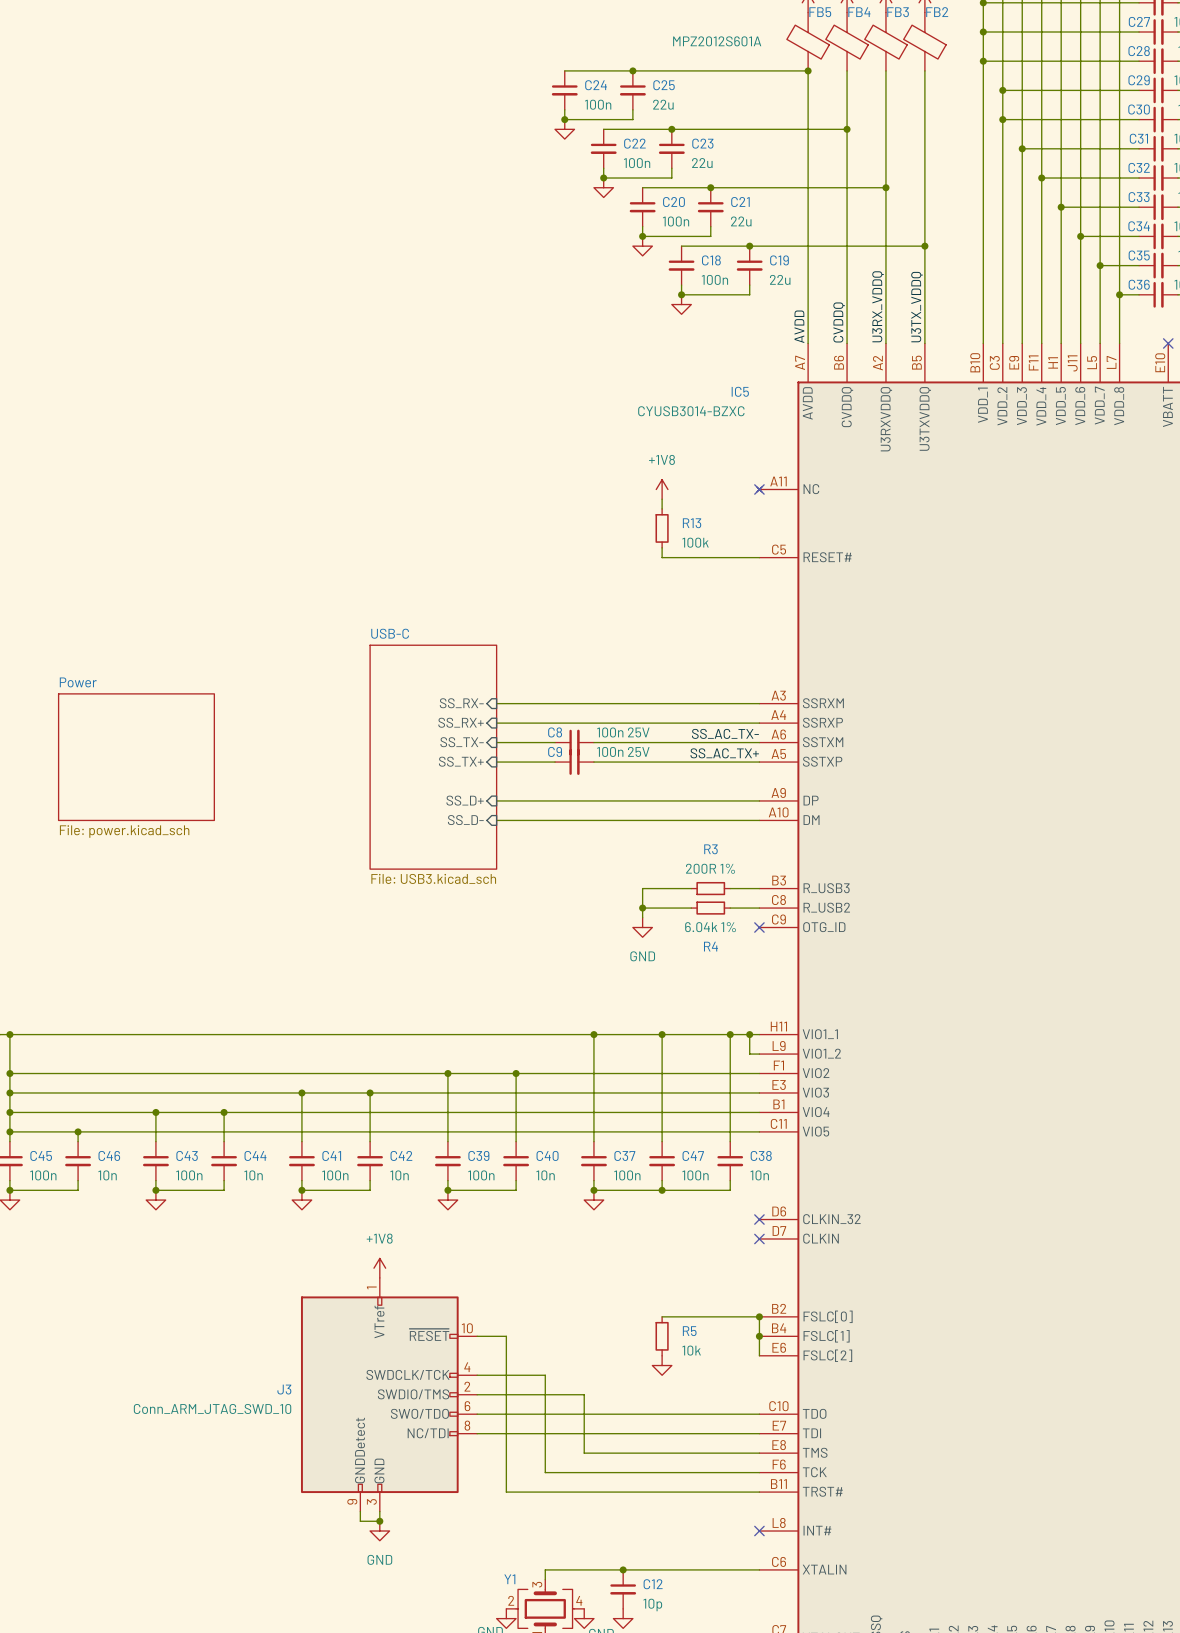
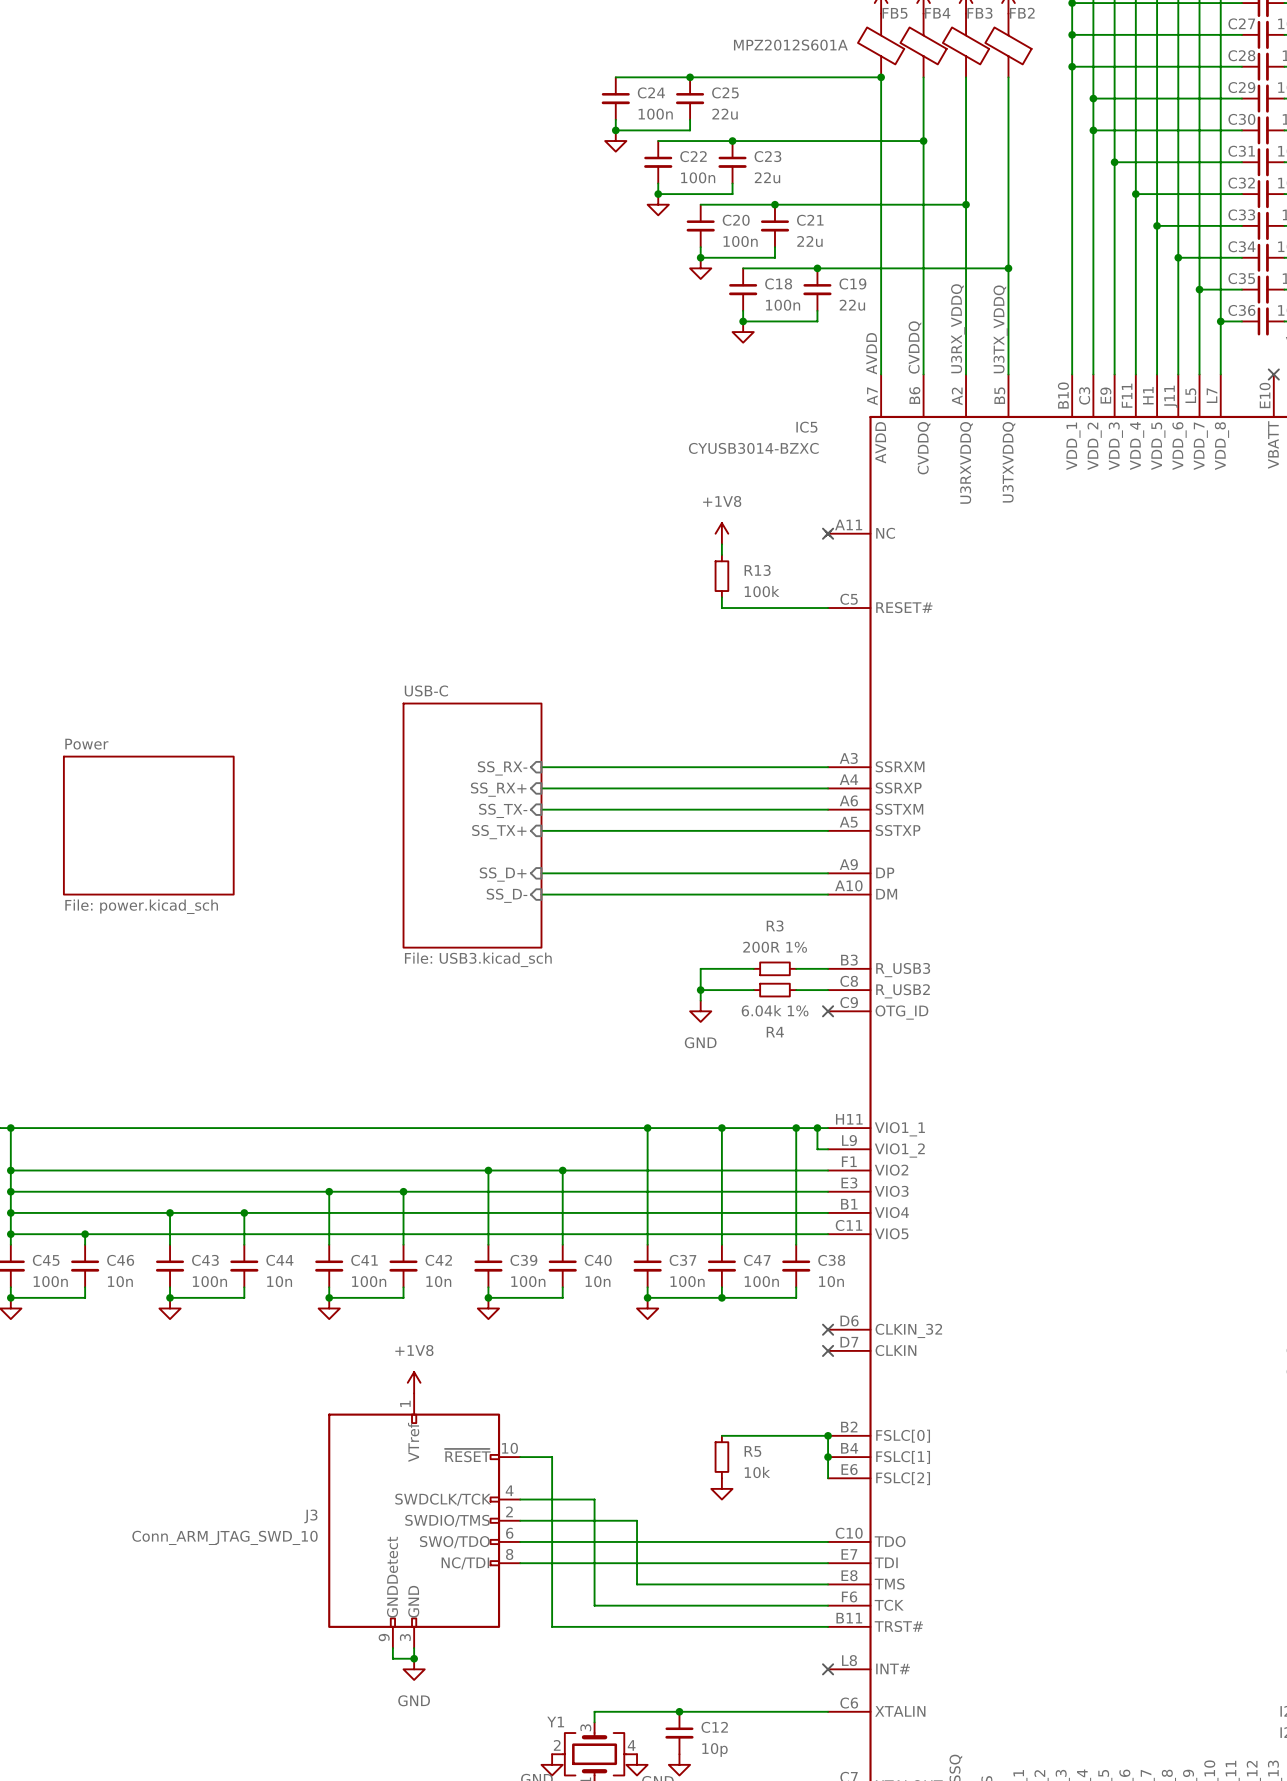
label: SS_AC_TX- (725, 733) -> none
C8: 100n 25V (574, 742) -> none
label: SS_AC_TX+ (724, 753) -> none
C9: 100n 25V (574, 762) -> none

